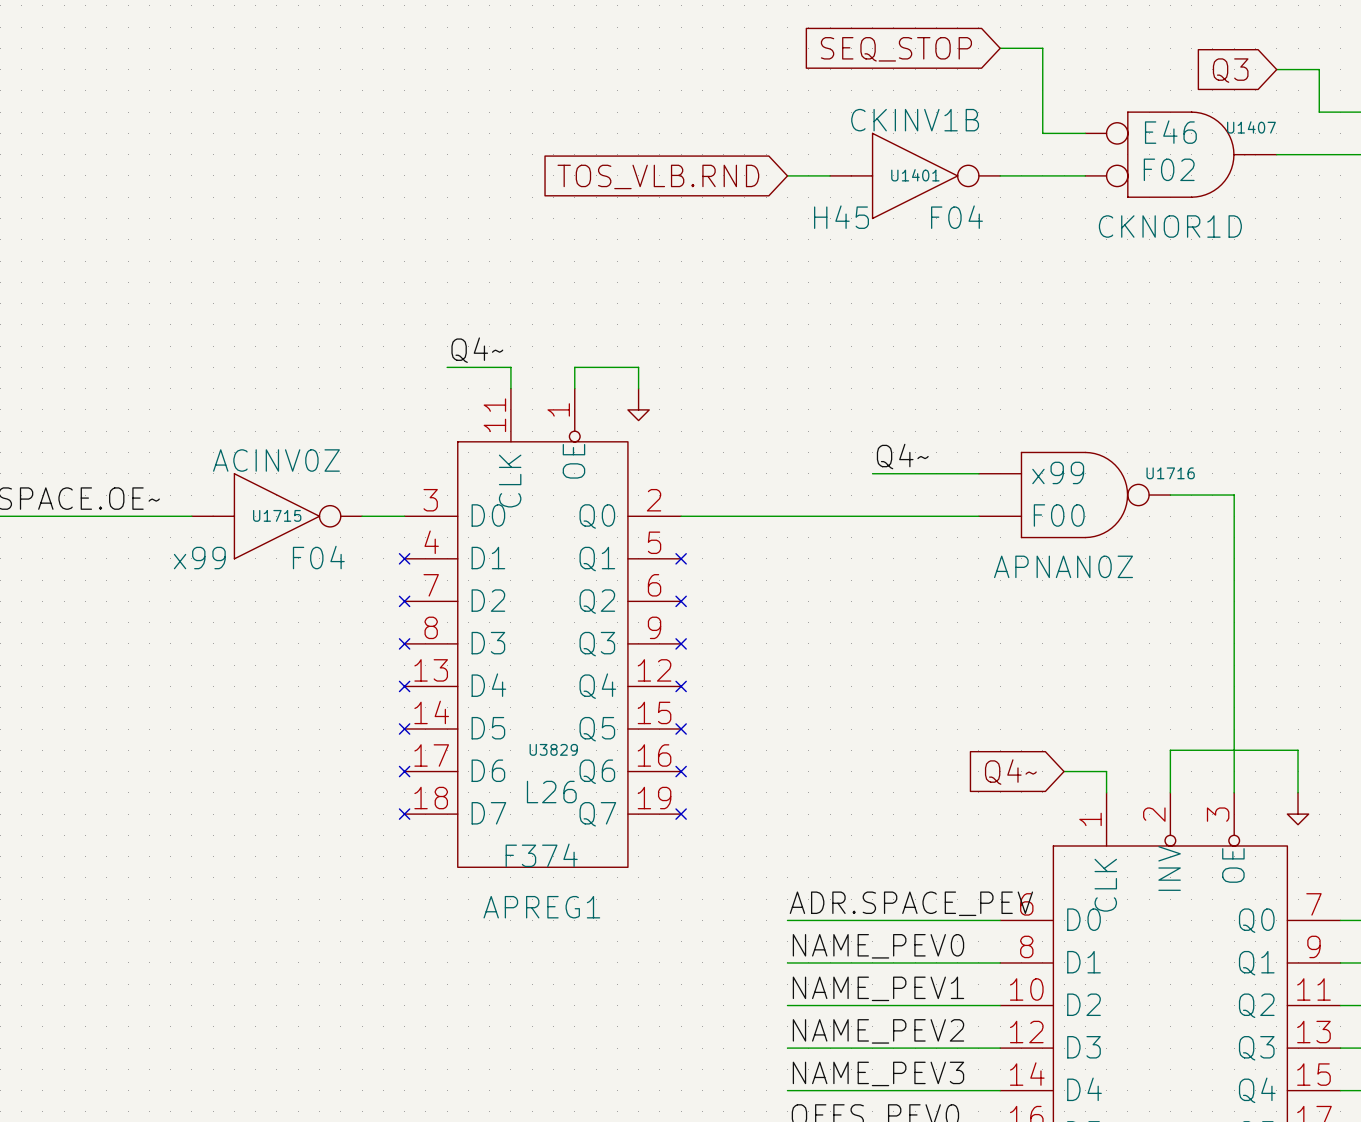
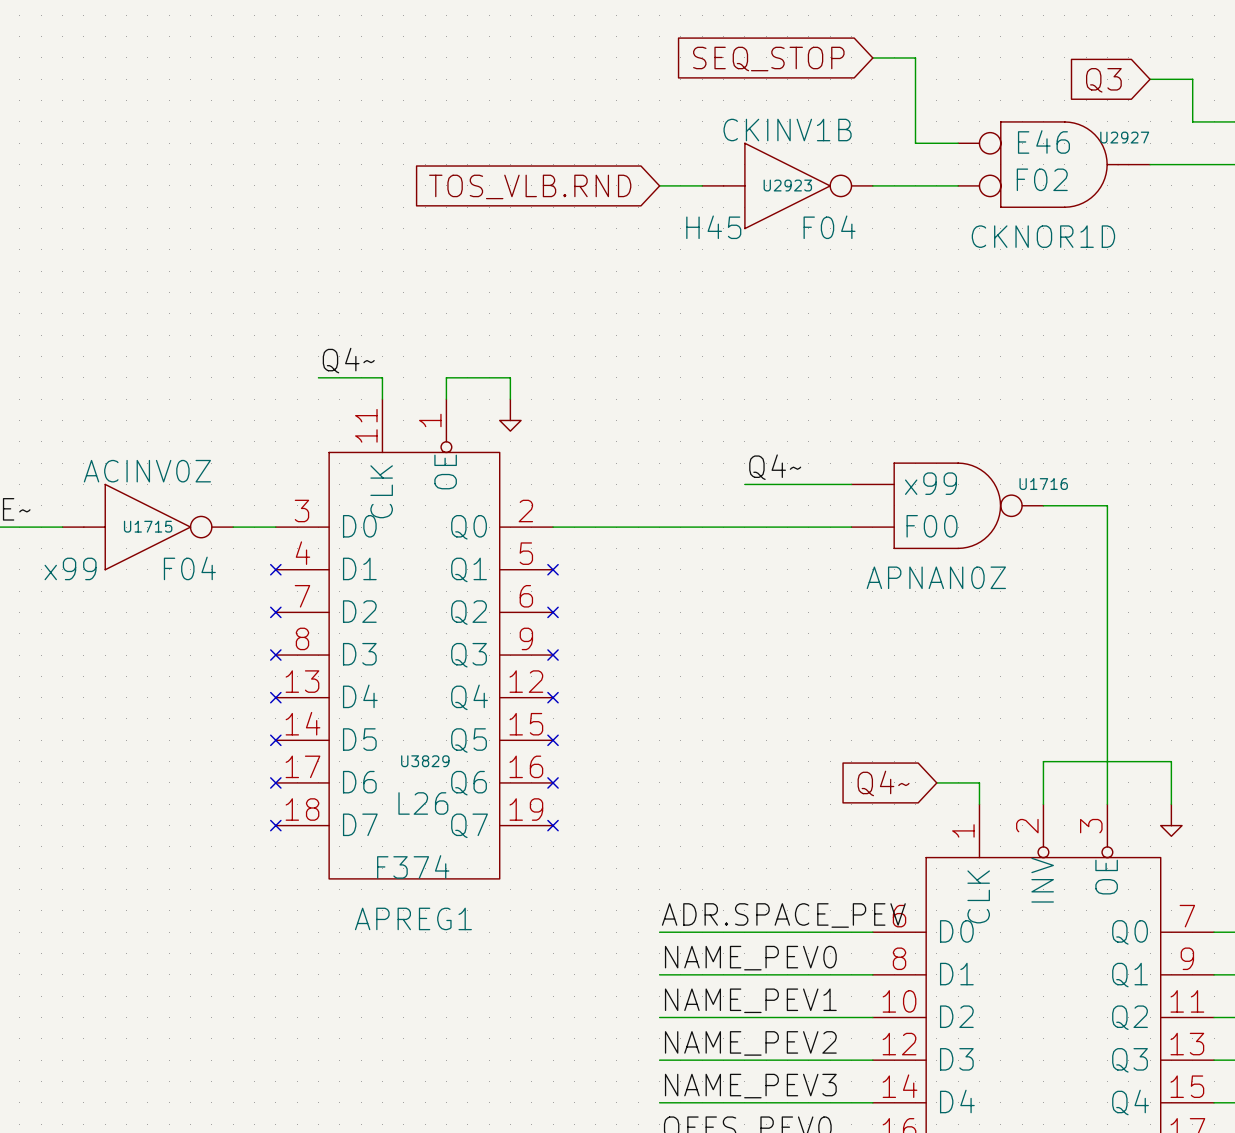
U1407 name: U1407 (1251, 127) -> U2927 (1124, 137)
U1401 name: U1401 (915, 175) -> U2923 (787, 185)

